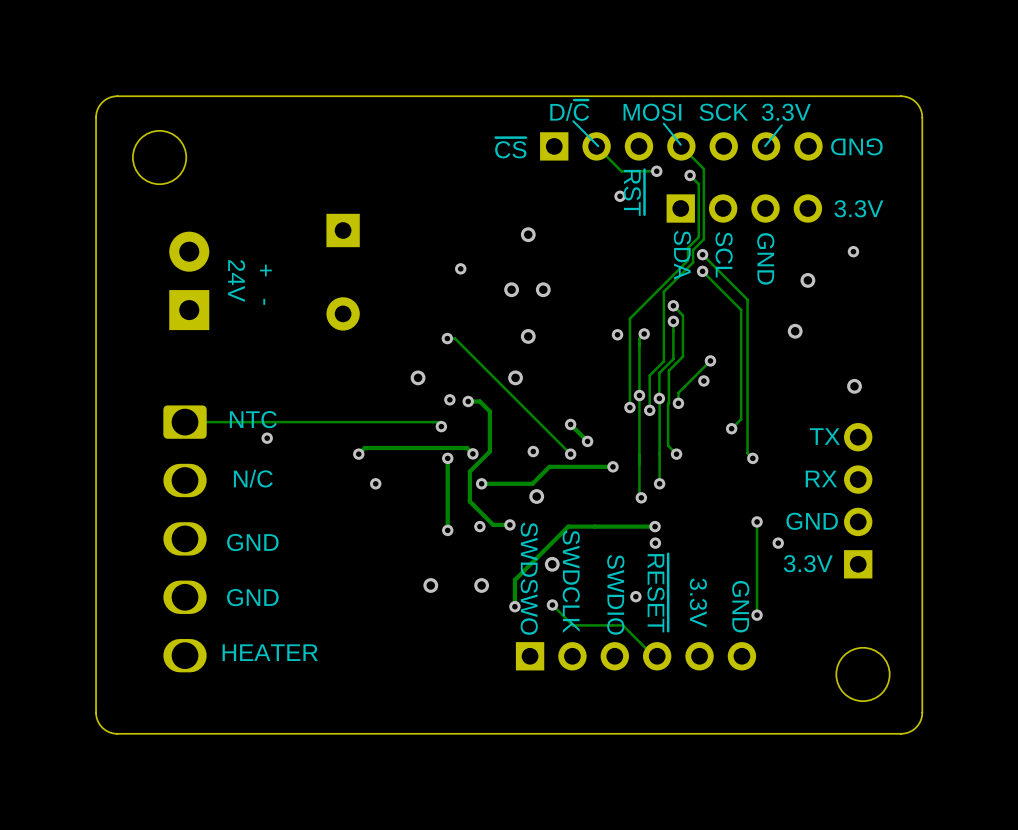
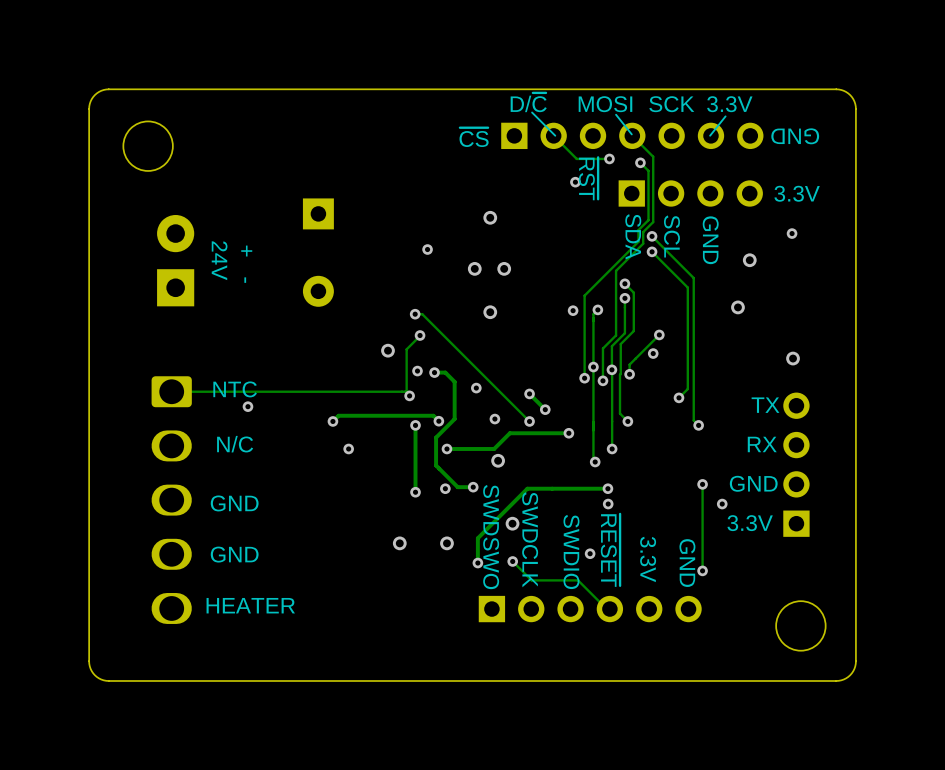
track: none -> (420, 335) (406, 349) (406, 392)
via: none -> (420, 335)
via: (515, 377) -> none
via: none -> (476, 388)

